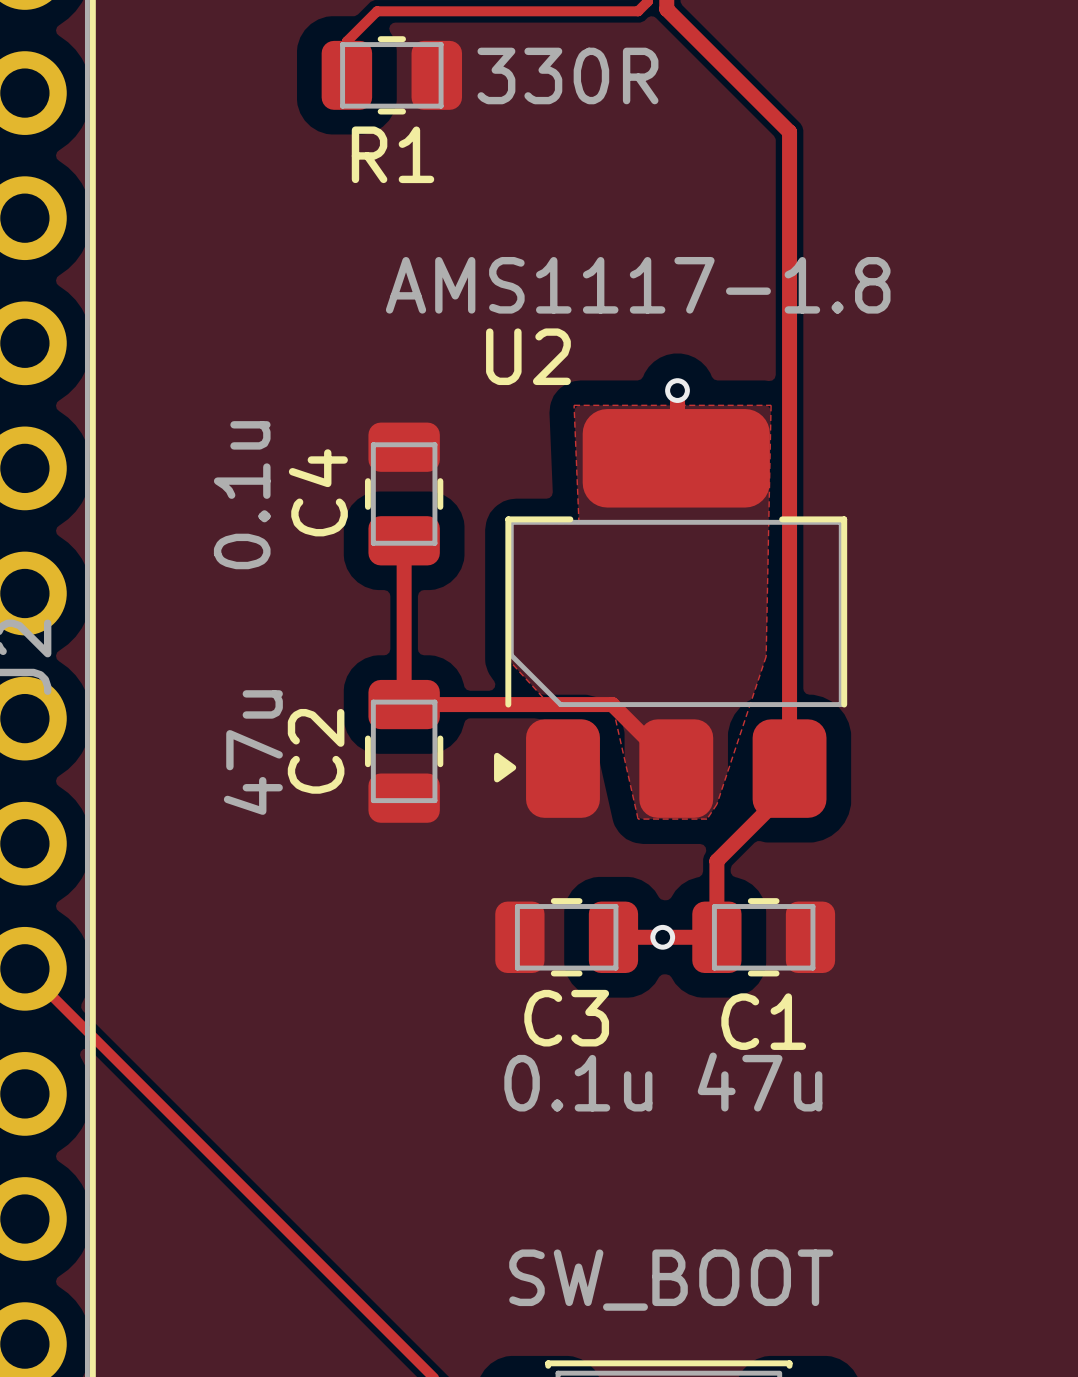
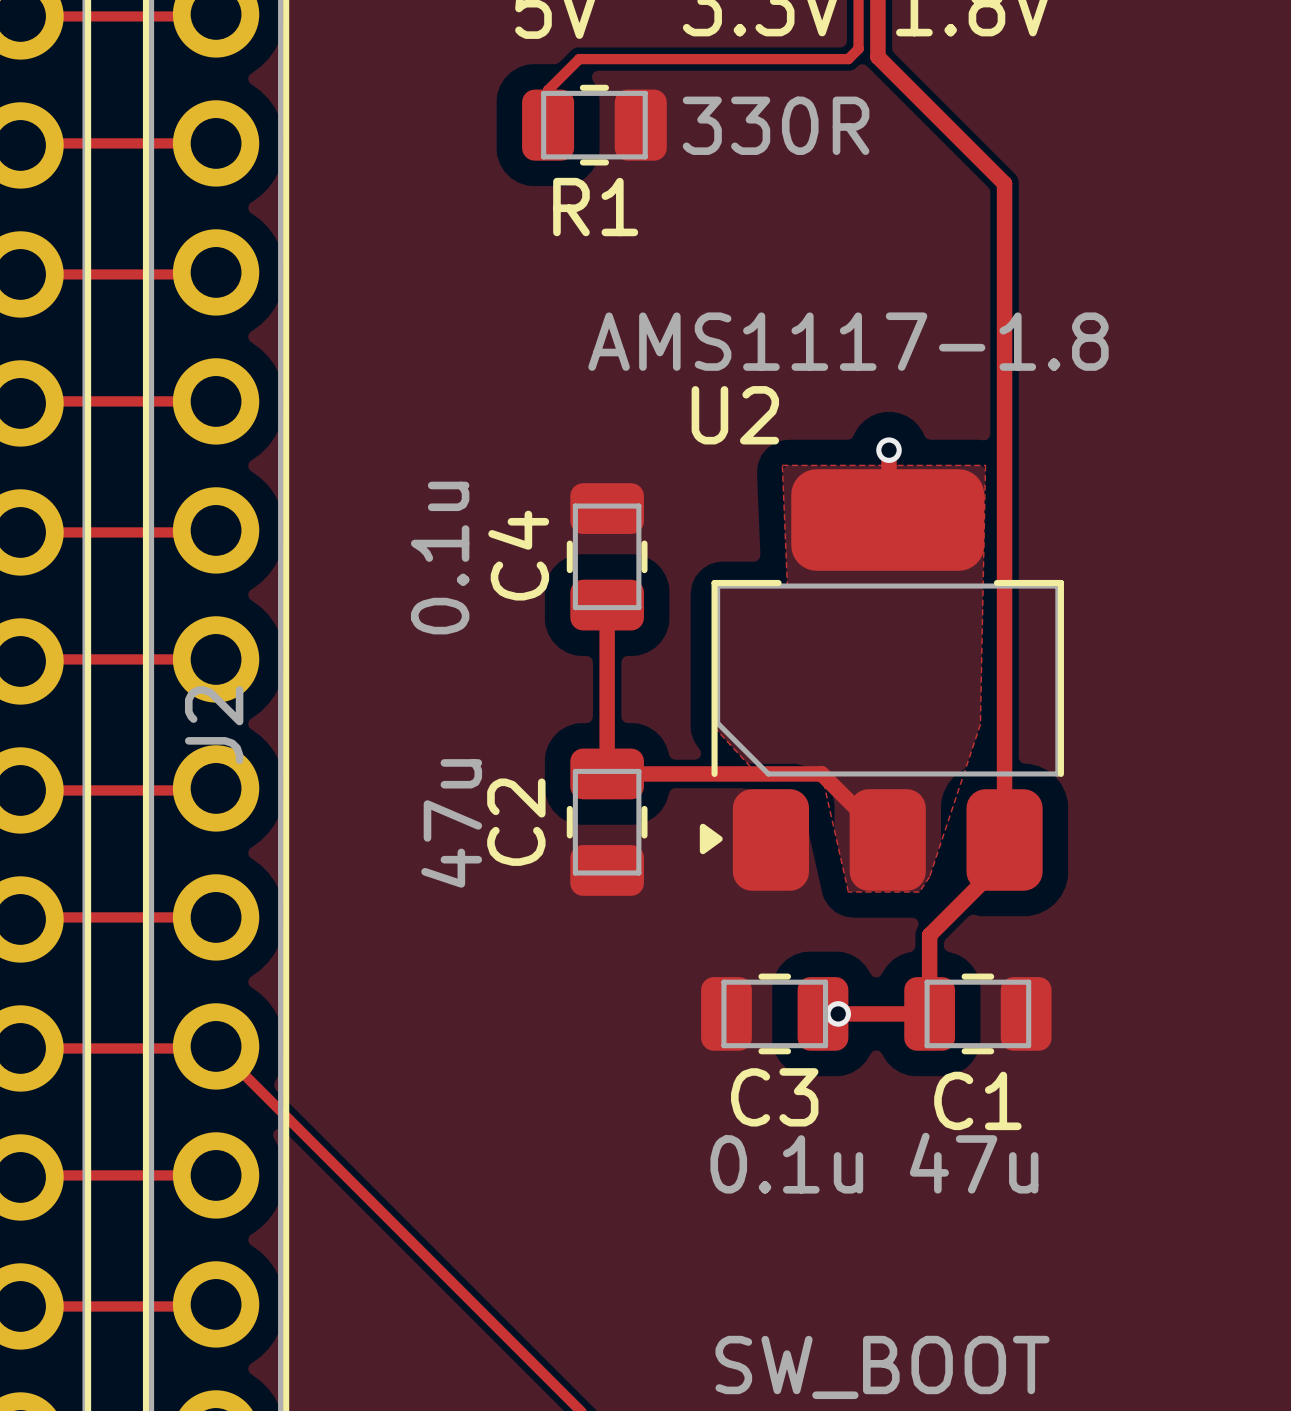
via position: (662, 937) -> (838, 1013)

